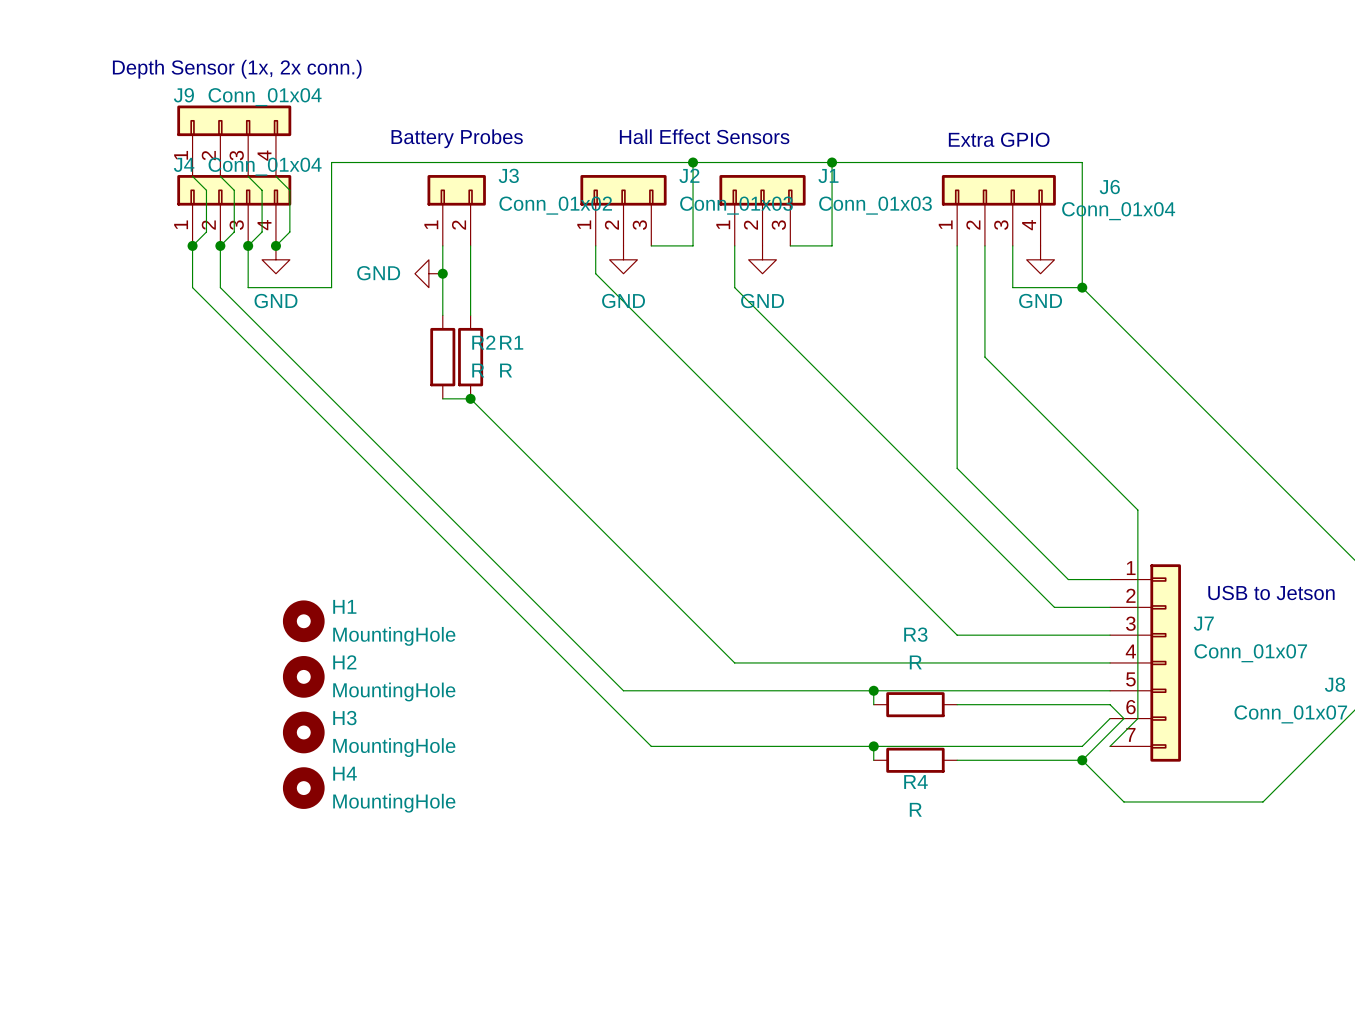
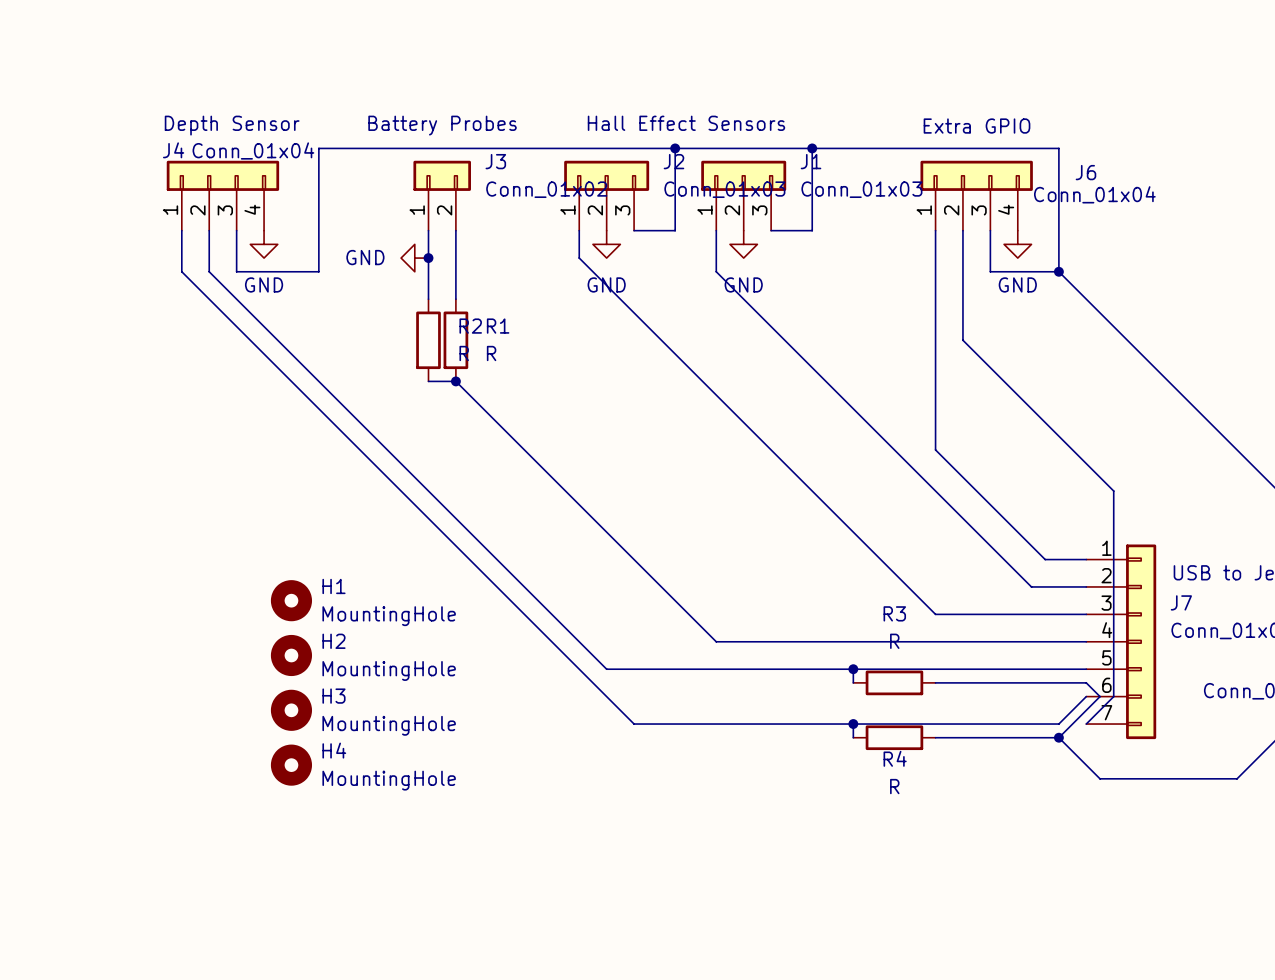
text: Depth Sensor (1x, 2x conn.) (237, 69) -> none
text: none -> Depth Sensor (232, 125)
J9: Conn_01x04 (234, 140) -> none
wire: (192, 176) (206, 190) (206, 232) (192, 245) -> none
wire: (220, 176) (234, 190) (234, 232) (220, 245) -> none
wire: (248, 176) (262, 190) (262, 232) (248, 245) -> none
wire: (275, 176) (289, 190) (289, 232) (275, 245) -> none
junction: (192, 245) -> none
junction: (220, 245) -> none
junction: (248, 245) -> none
junction: (275, 245) -> none

